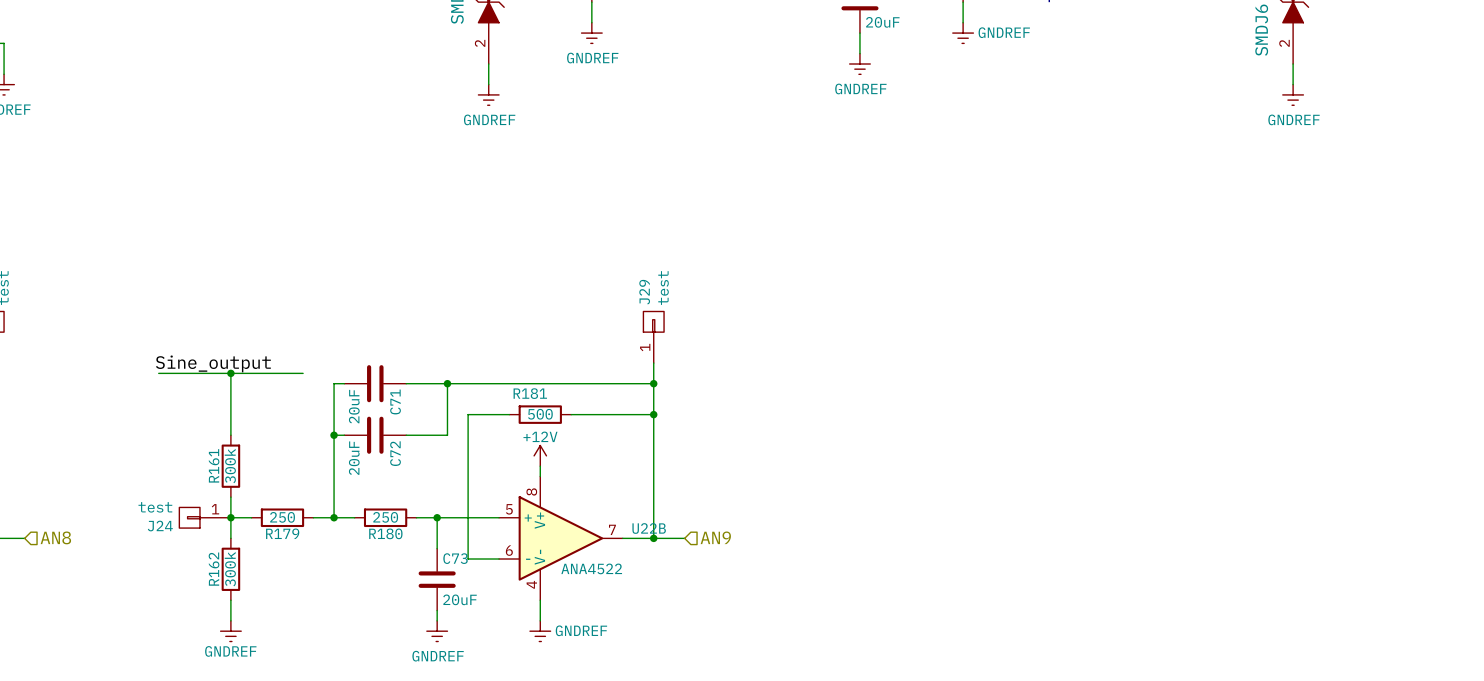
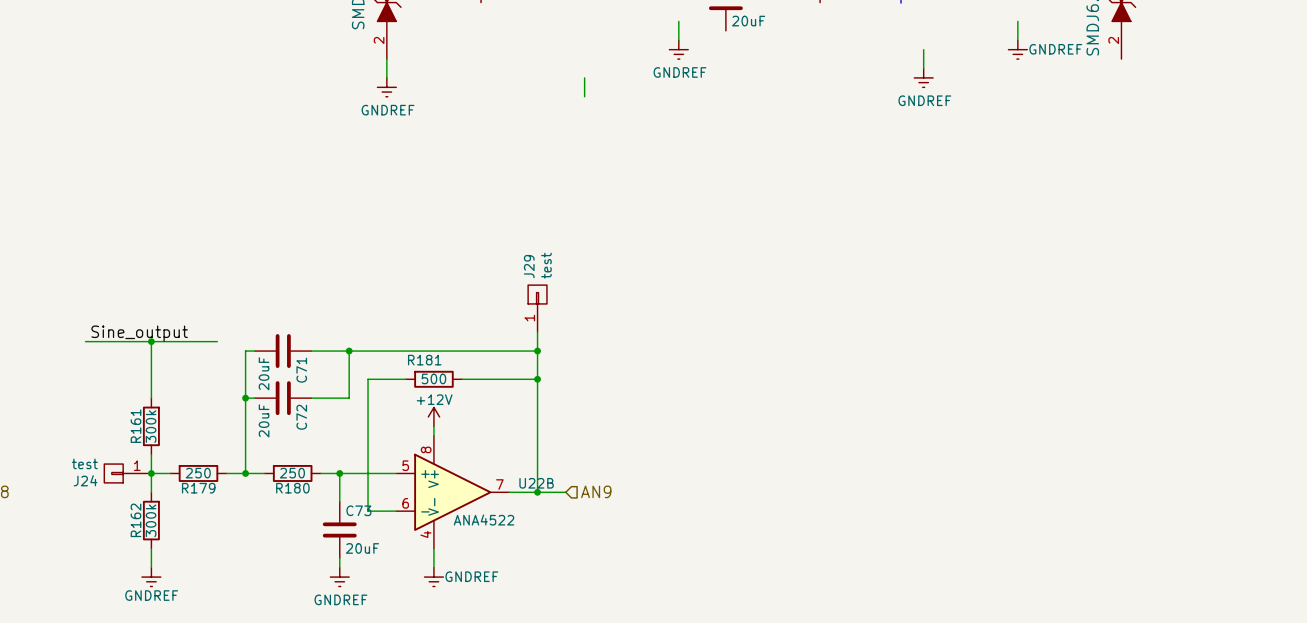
wire: (591, 2) (591, 22) -> (584, 77) (584, 96)
wire: (963, 2) (963, 22) -> (923, 49) (923, 68)
power symbol: GNDREF (591, 33) -> none
wire: (859, 33) (859, 53) -> (678, 21) (678, 40)
power symbol: GNDREF (963, 33) -> none
power symbol: none -> GNDREF (1017, 49)
power symbol position: GNDREF (859, 64) -> GNDREF (678, 49)
wire: (1293, 64) (1293, 84) -> (1017, 21) (1017, 40)
power symbol: none -> GNDREF (923, 77)
power symbol: GNDREF (1293, 94) -> none

